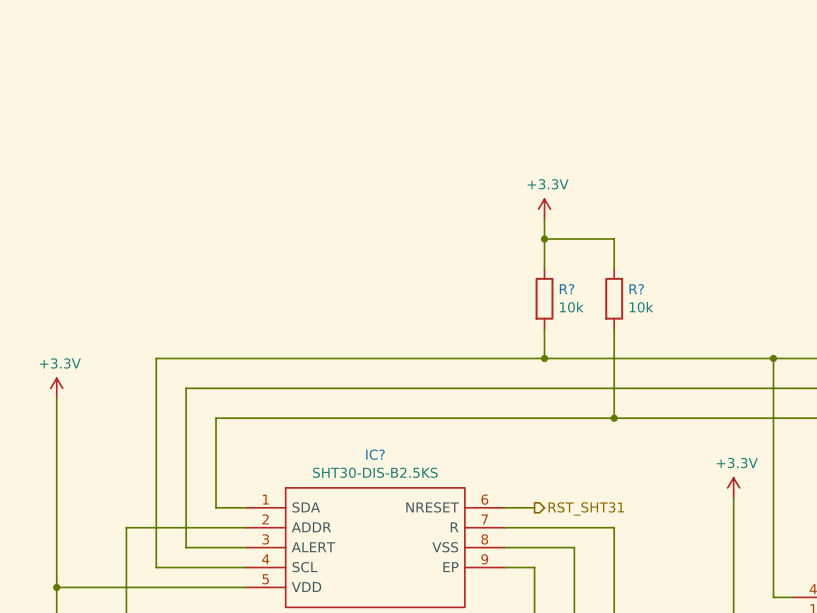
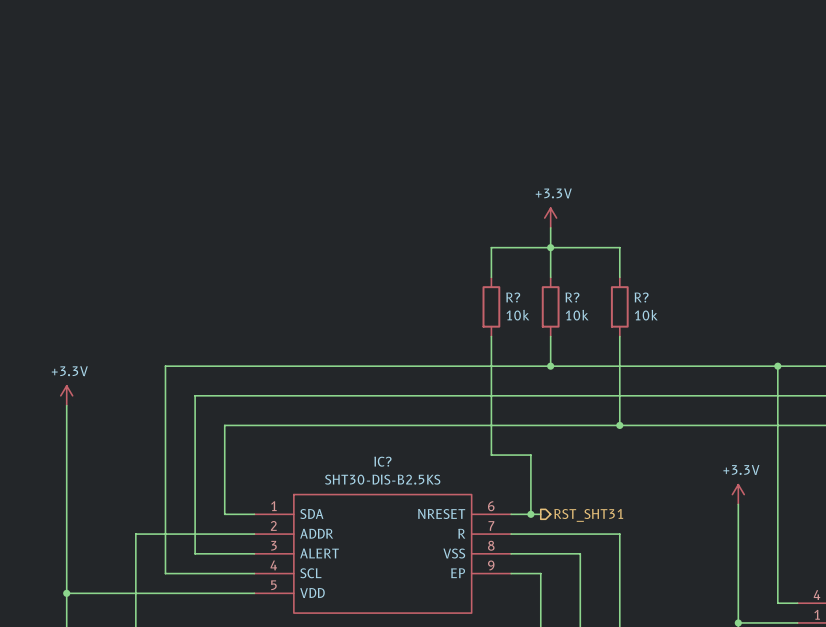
wire: none -> (550, 247) (491, 247) (491, 277)
R?: none -> 10k (491, 306)
wire: none -> (491, 336) (491, 455) (530, 455) (530, 514)
junction: none -> (530, 514)

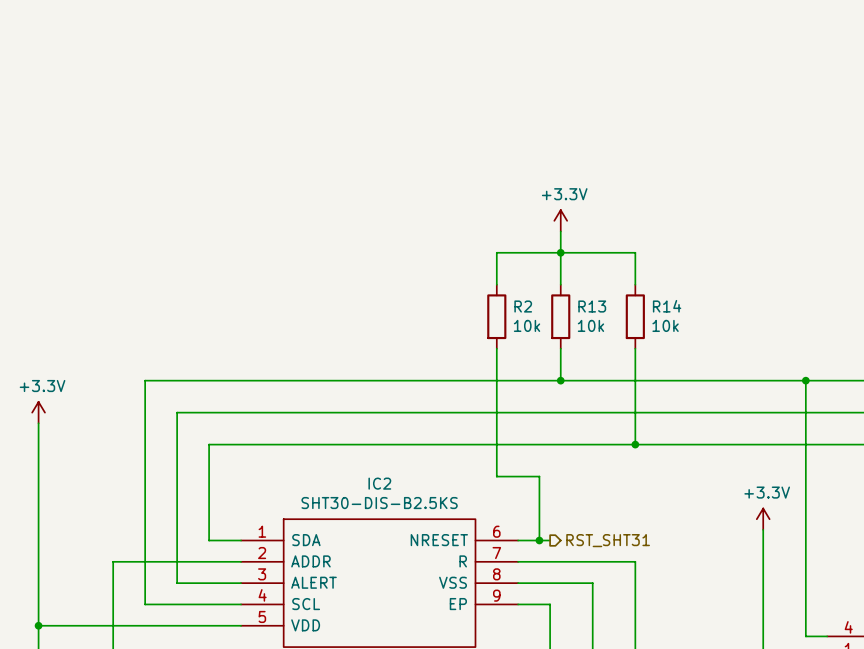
R? name: R? (513, 297) -> R2 (523, 306)
R? name: R? (572, 297) -> R13 (592, 306)
R? name: R? (641, 297) -> R14 (667, 306)
IC? name: IC? (382, 461) -> IC2 (379, 483)

